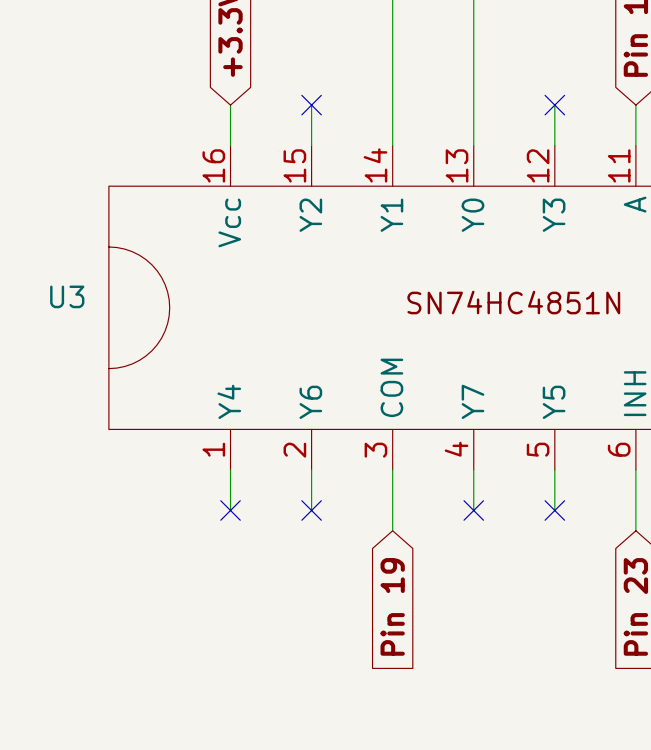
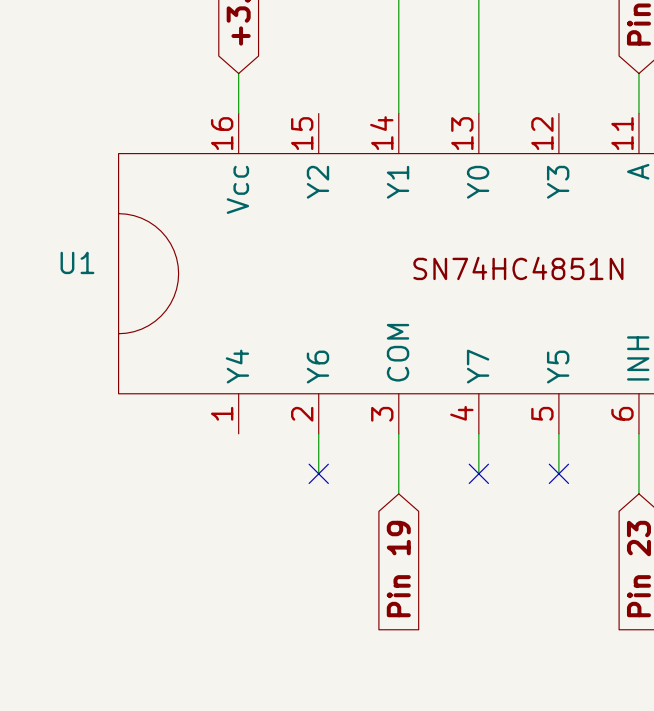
wire: (311, 105) (311, 145) -> none
no-connect mark: (311, 105) -> none
wire: (554, 105) (554, 145) -> none
no-connect mark: (554, 105) -> none
U3 name: U3 (67, 296) -> U1 (77, 262)
wire: (230, 469) (230, 510) -> none
no-connect mark: (230, 510) -> none

